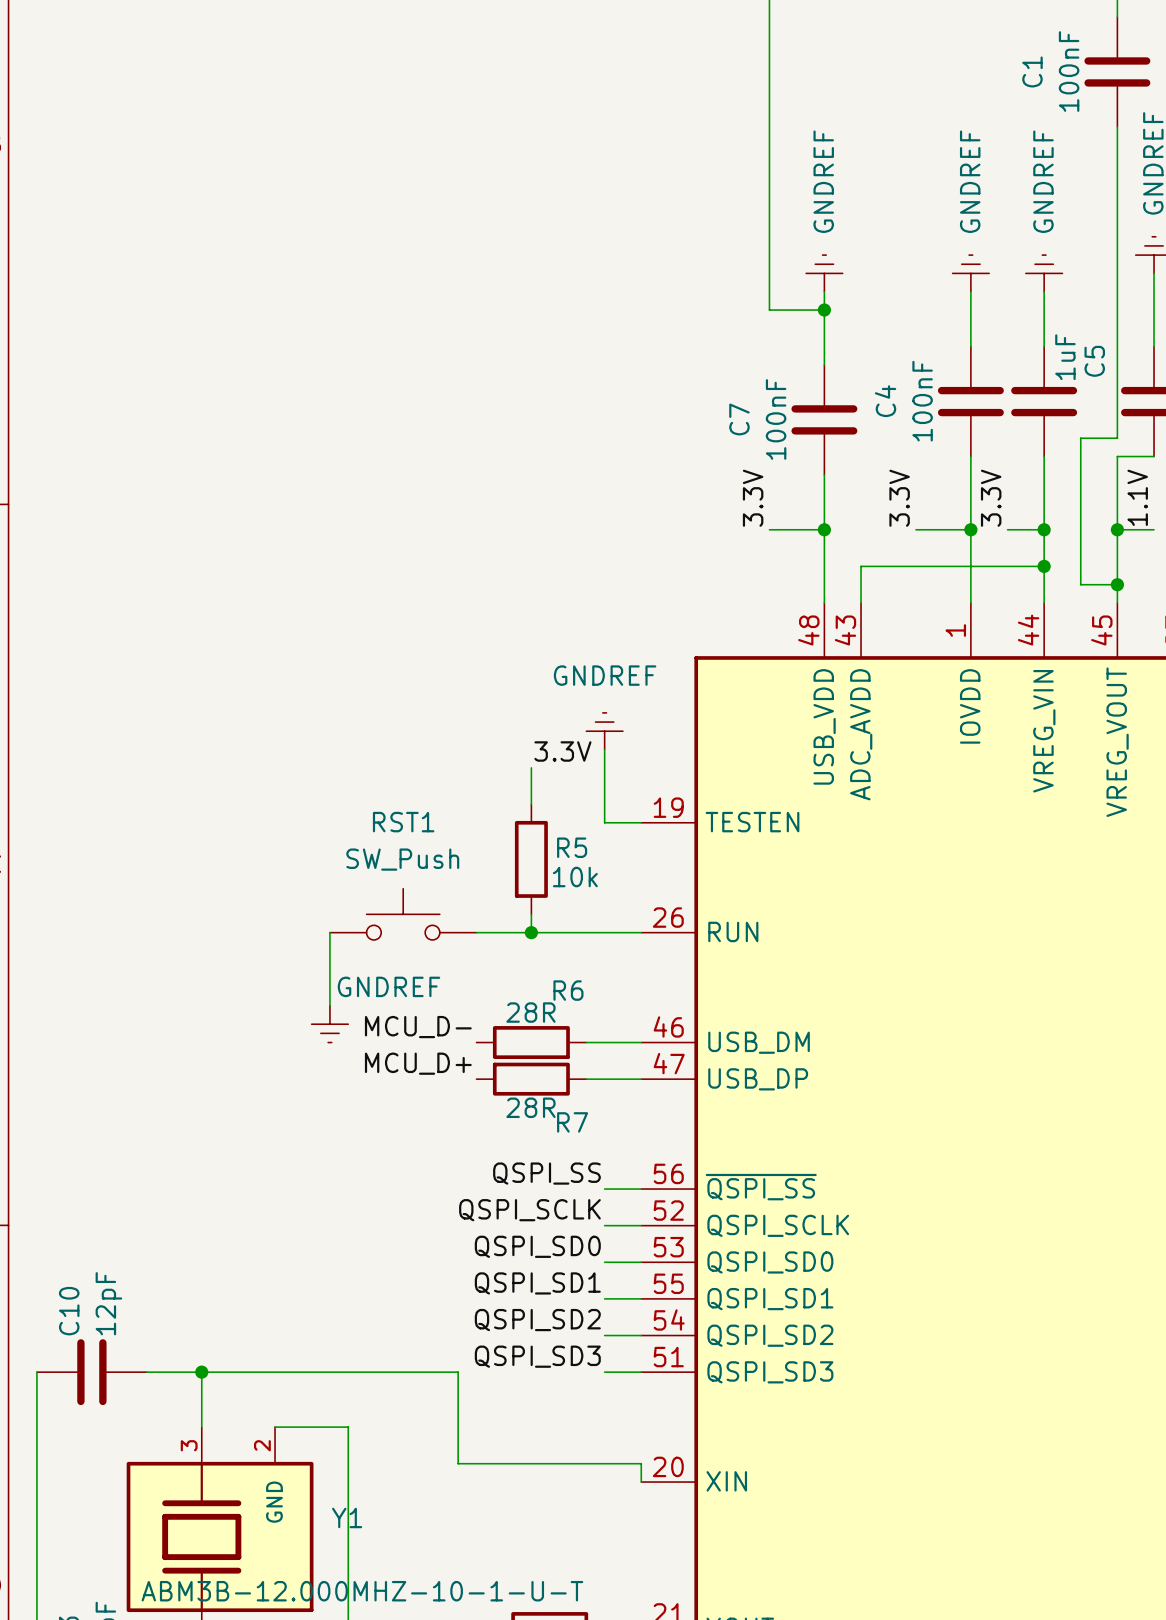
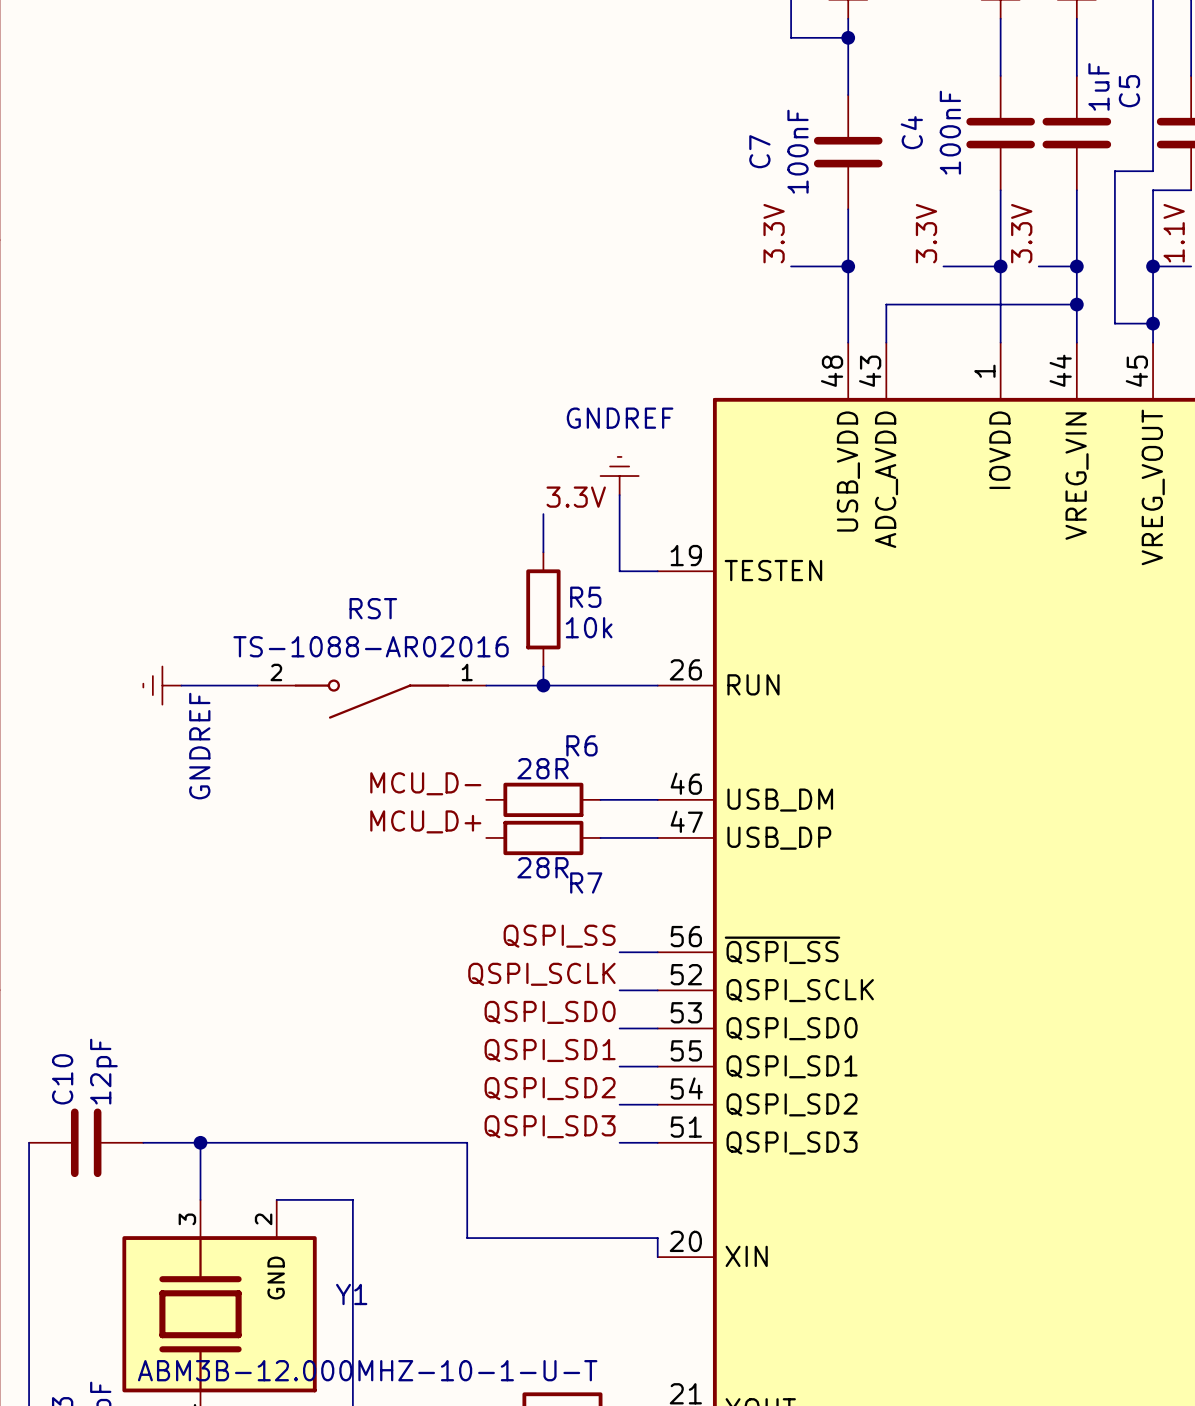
RST1: SW_Push (403, 914) -> none
wire: none -> (181, 685) (257, 685)
wire: (329, 932) (329, 1005) -> none
RST: none -> TS-1088-AR02016 (371, 699)
power symbol rotation: 0° (329, 1024) -> 90° clockwise (162, 685)
power symbol position: GNDREF (329, 1024) -> GNDREF (162, 685)

